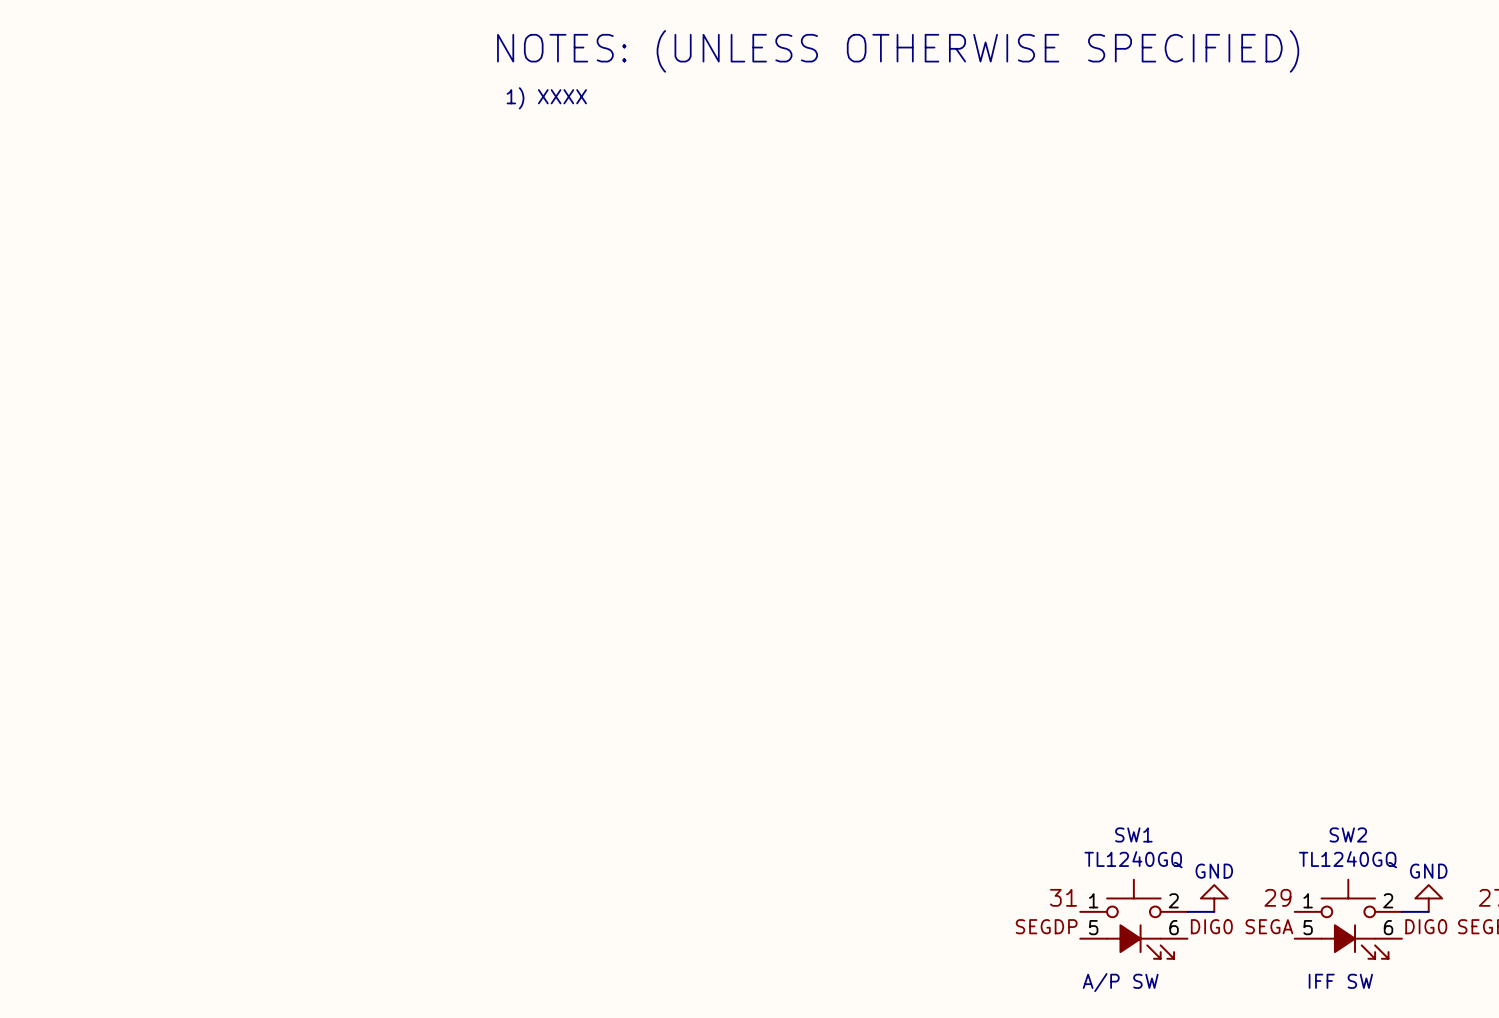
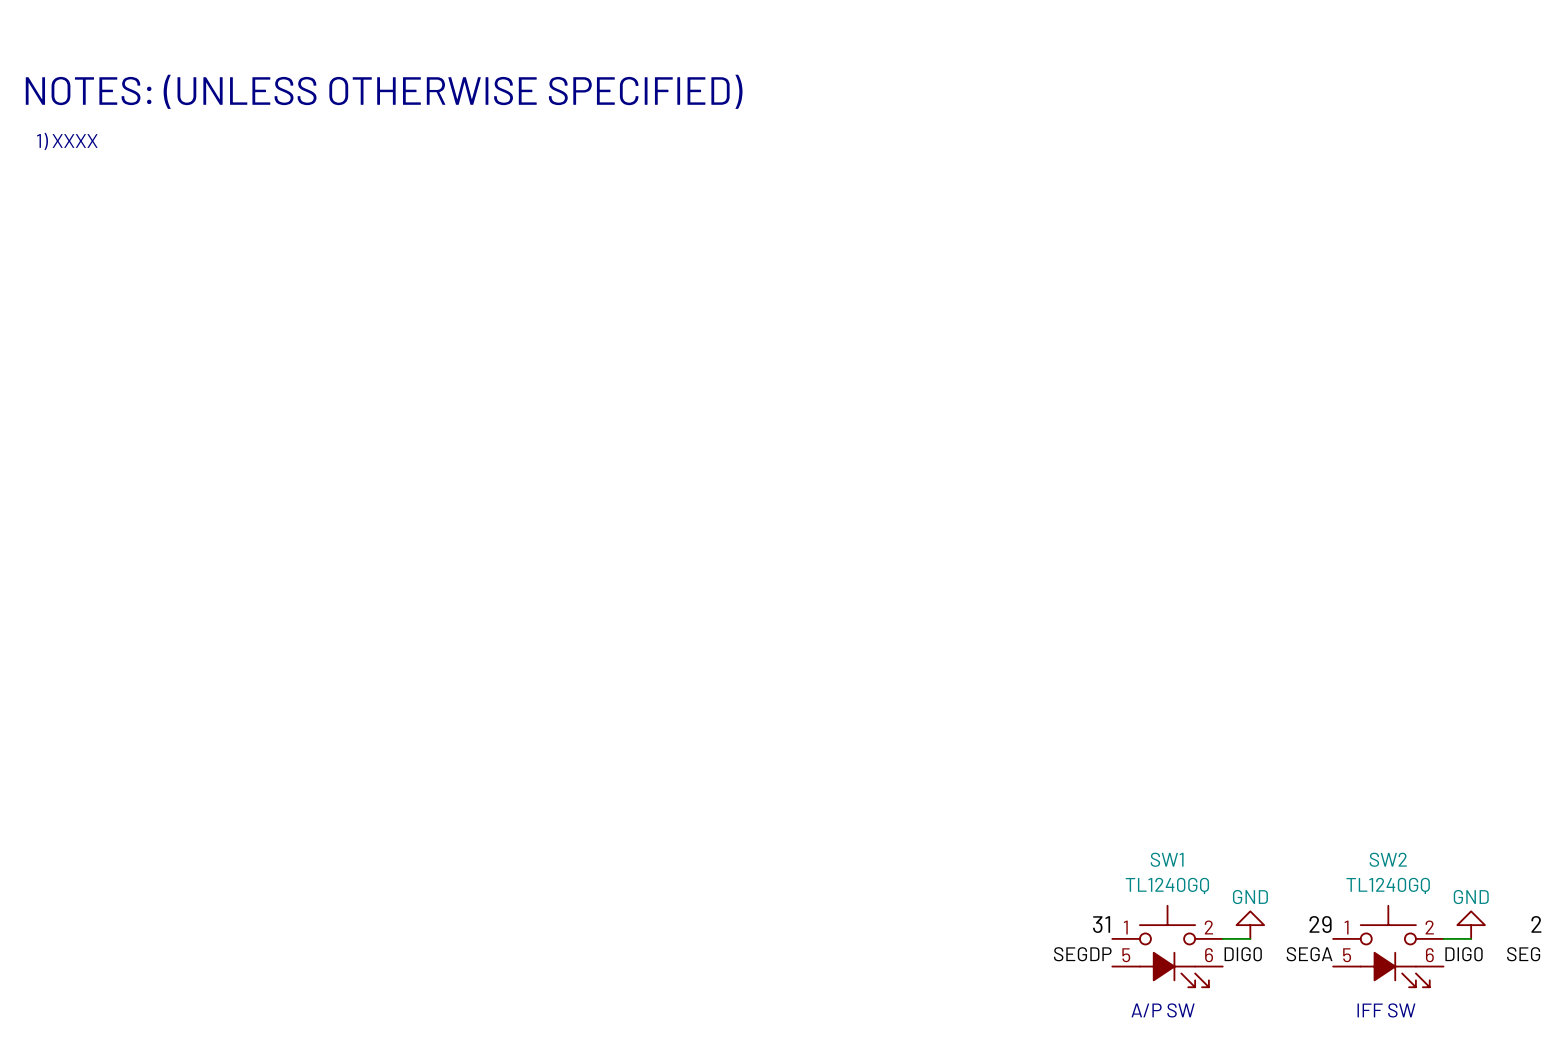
text: NOTES: (UNLESS OTHERWISE SPECIFIED) (898, 51) -> none
text: none -> NOTES: (UNLESS OTHERWISE SPECIFIED) (384, 91)
text: 1) XXXX (546, 98) -> none
text: none -> 1) XXXX (67, 141)

